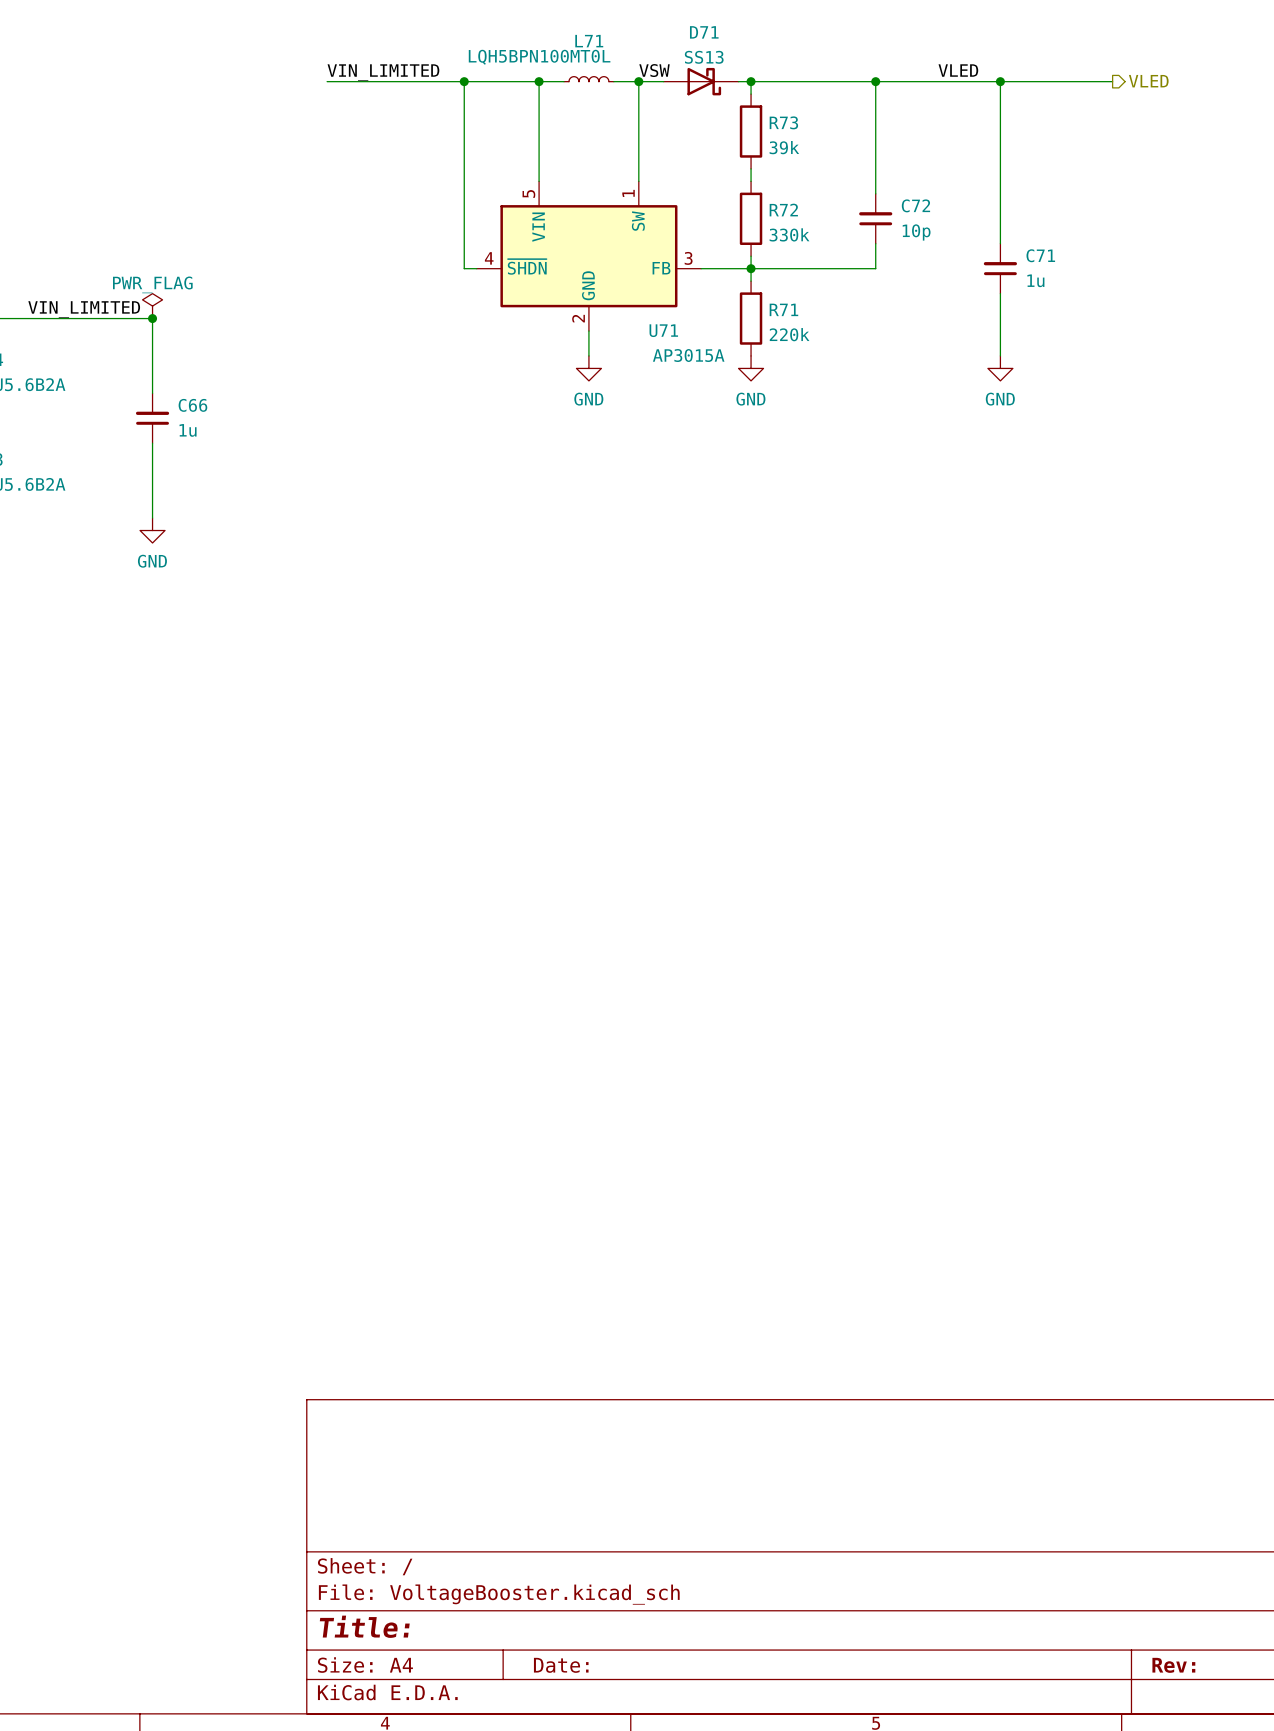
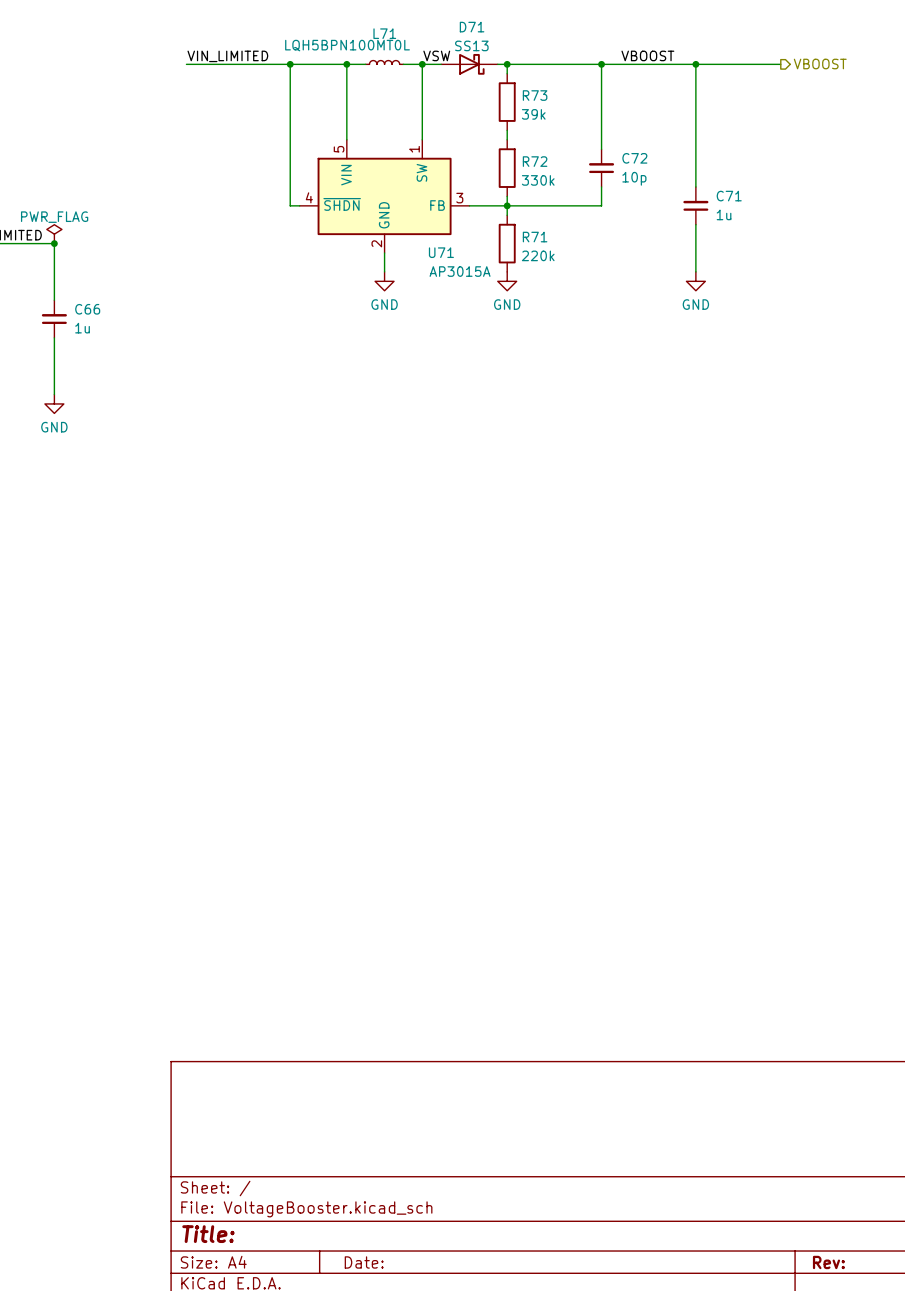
label: none -> VBOOST (647, 55)
label: VLED (958, 70) -> none
hierarchical label: VLED (1148, 81) -> VBOOST (820, 64)

